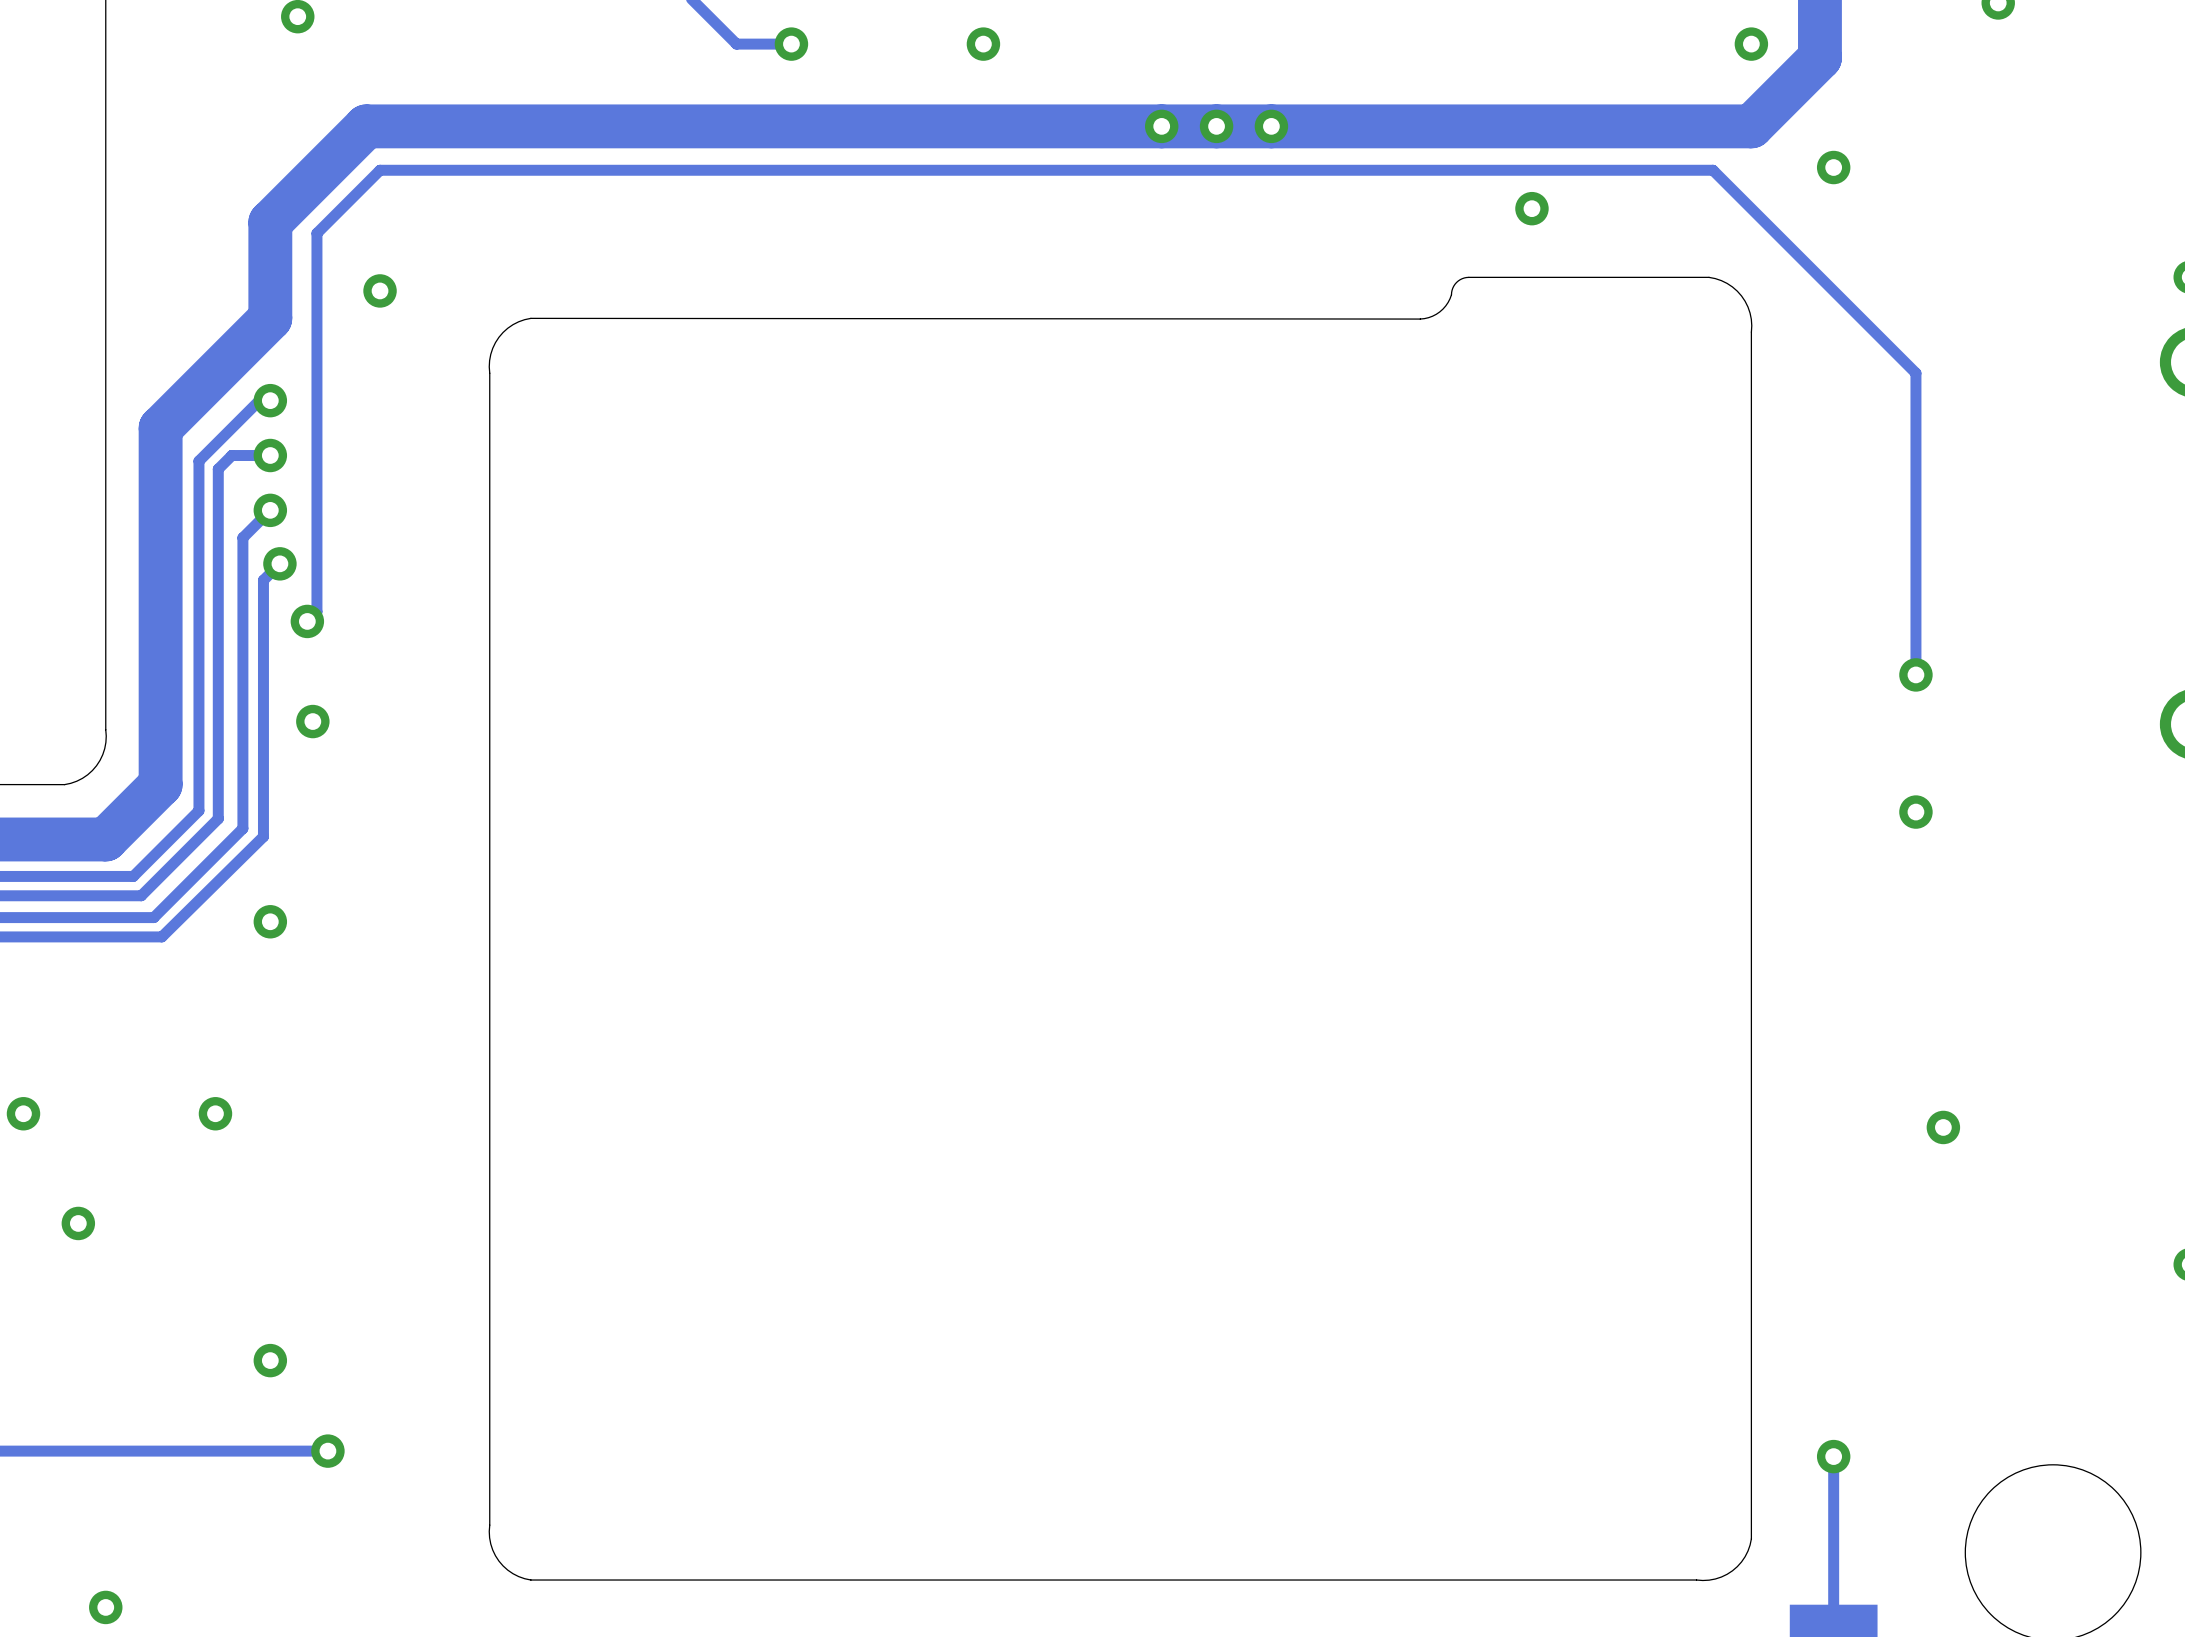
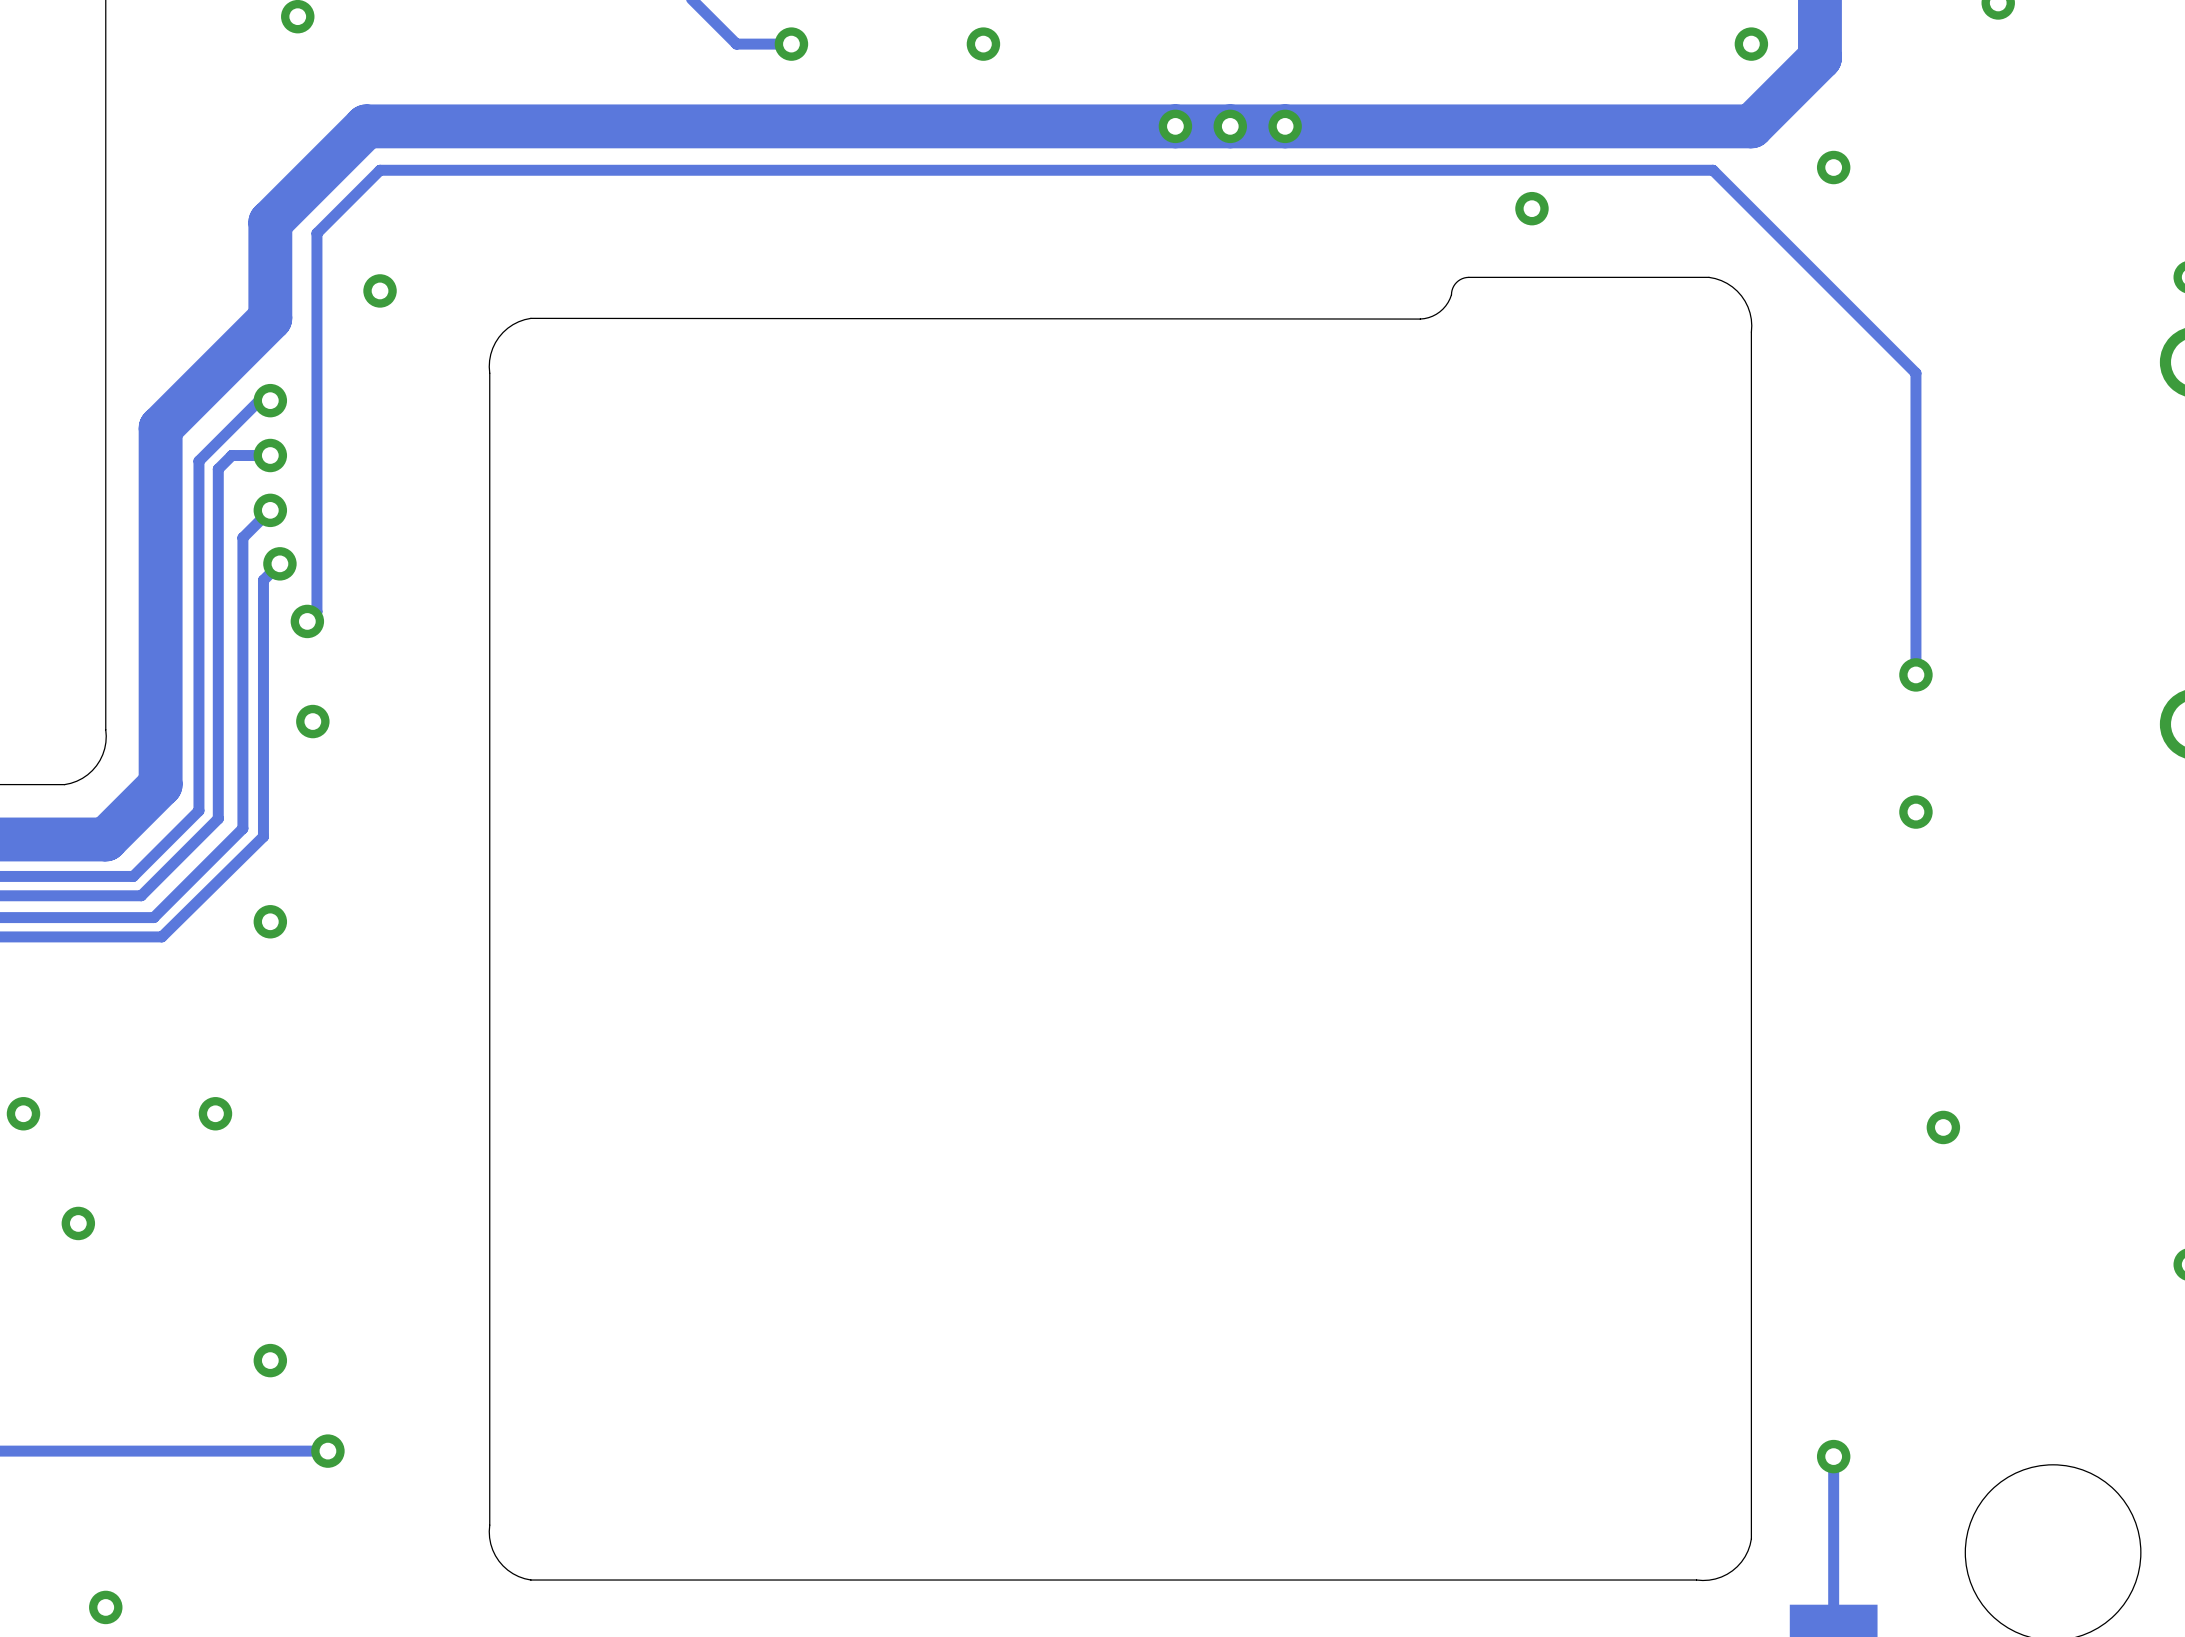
via position: (1161, 126) -> (1175, 126)
via position: (1216, 126) -> (1230, 126)
via position: (1271, 126) -> (1285, 126)

